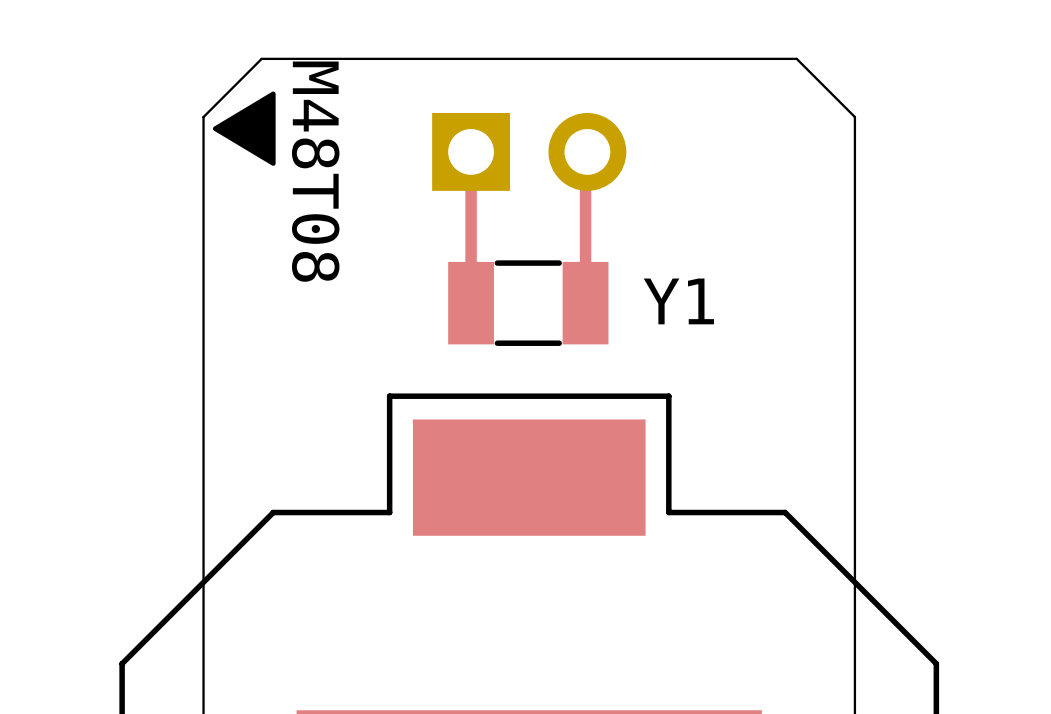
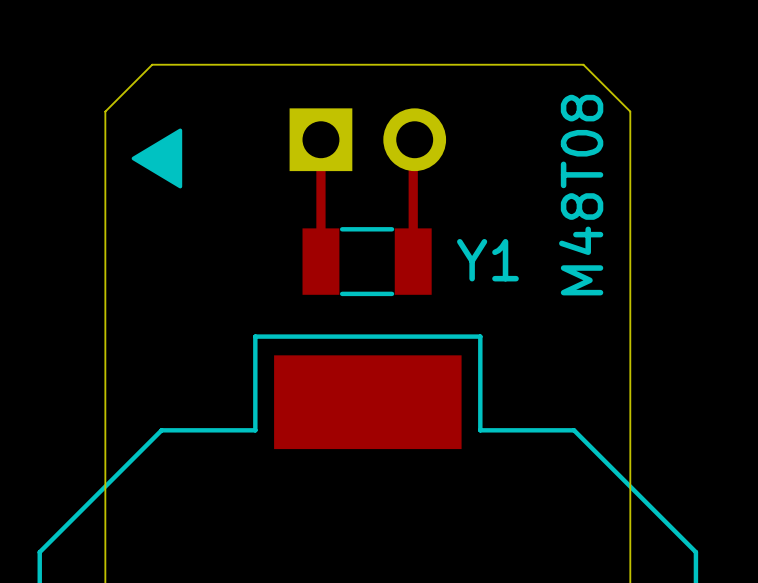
drawing position: (244, 128) -> (156, 158)
text rotation: 0° (315, 171) -> 180° (581, 195)
text position: M48T08 (315, 171) -> M48T08 (581, 195)

